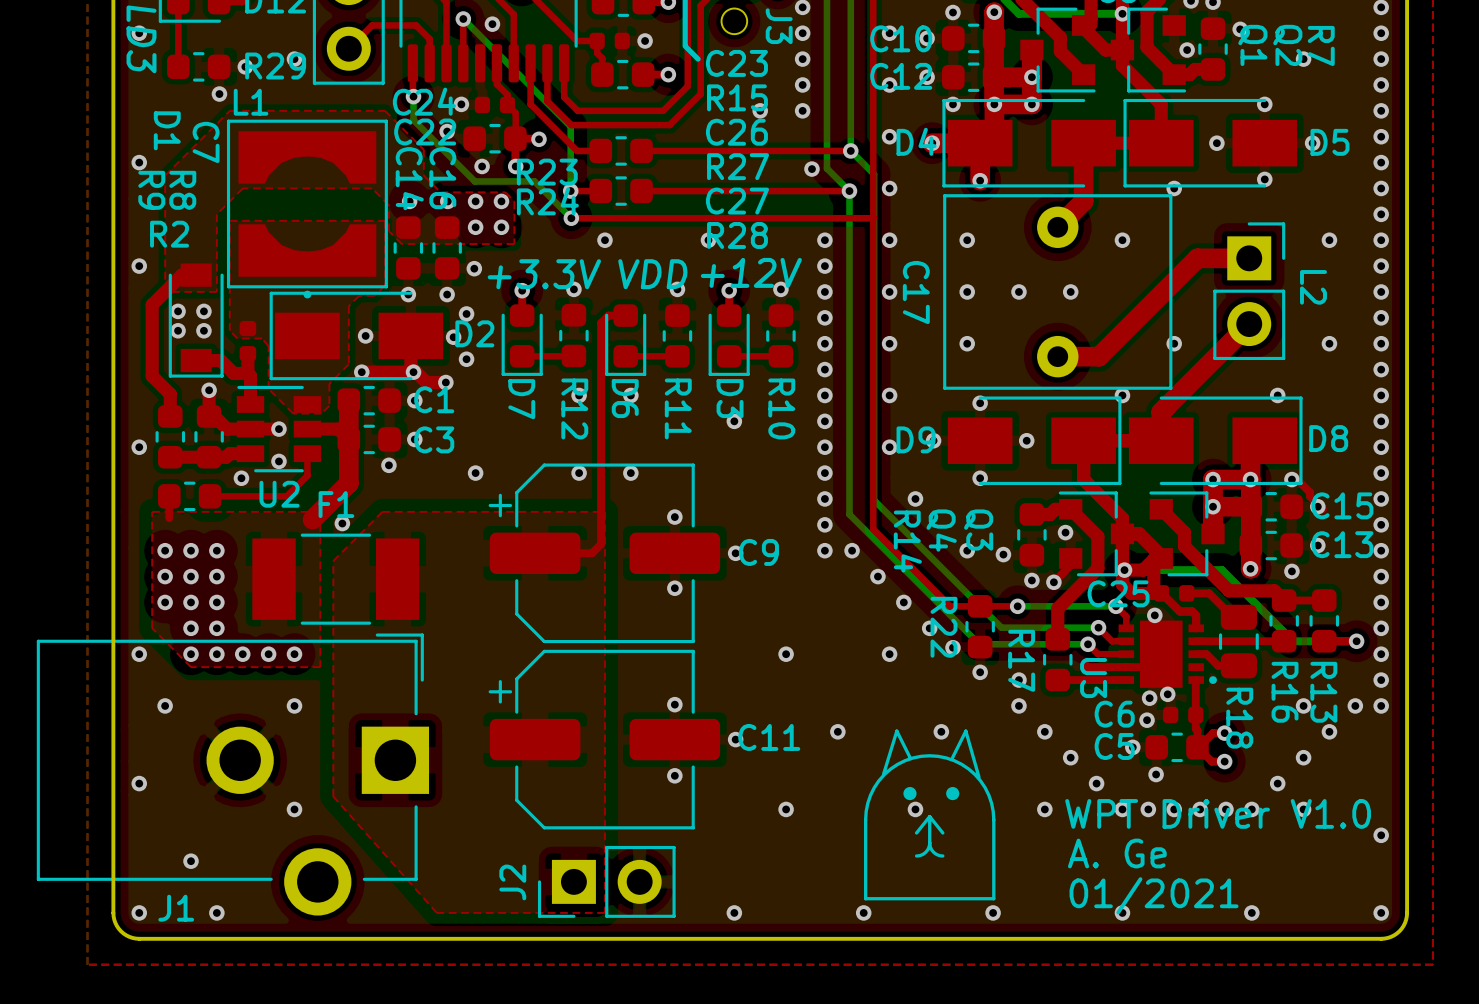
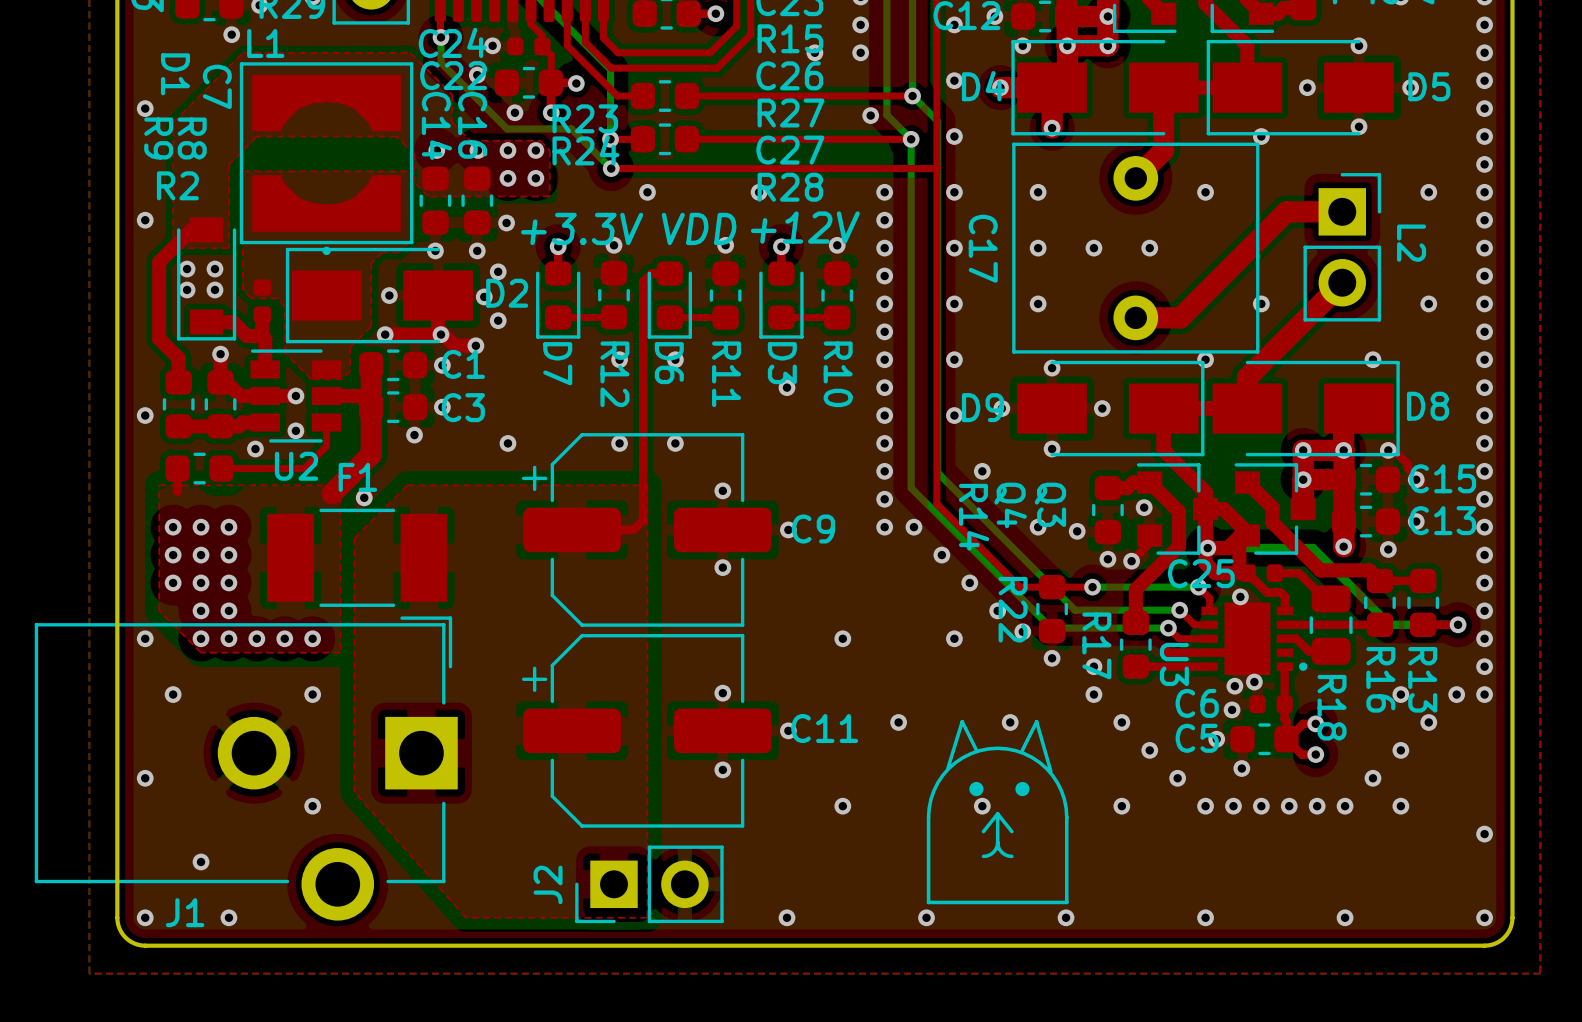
text: WPT Driver V1.0 (1218, 813) -> none
text: A. Ge (1117, 853) -> none
text: 01/2021 (1154, 895) -> none

